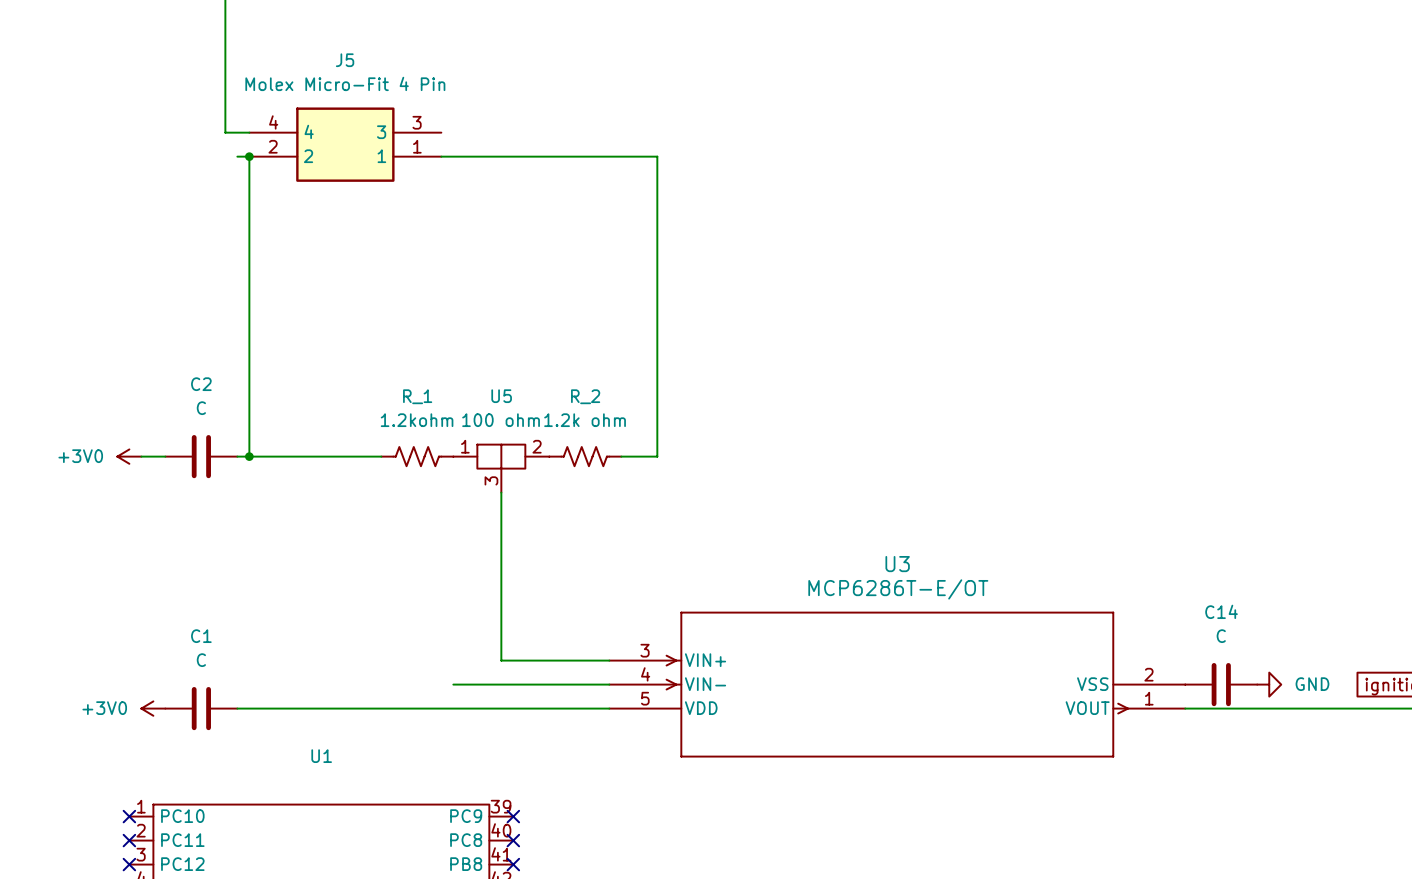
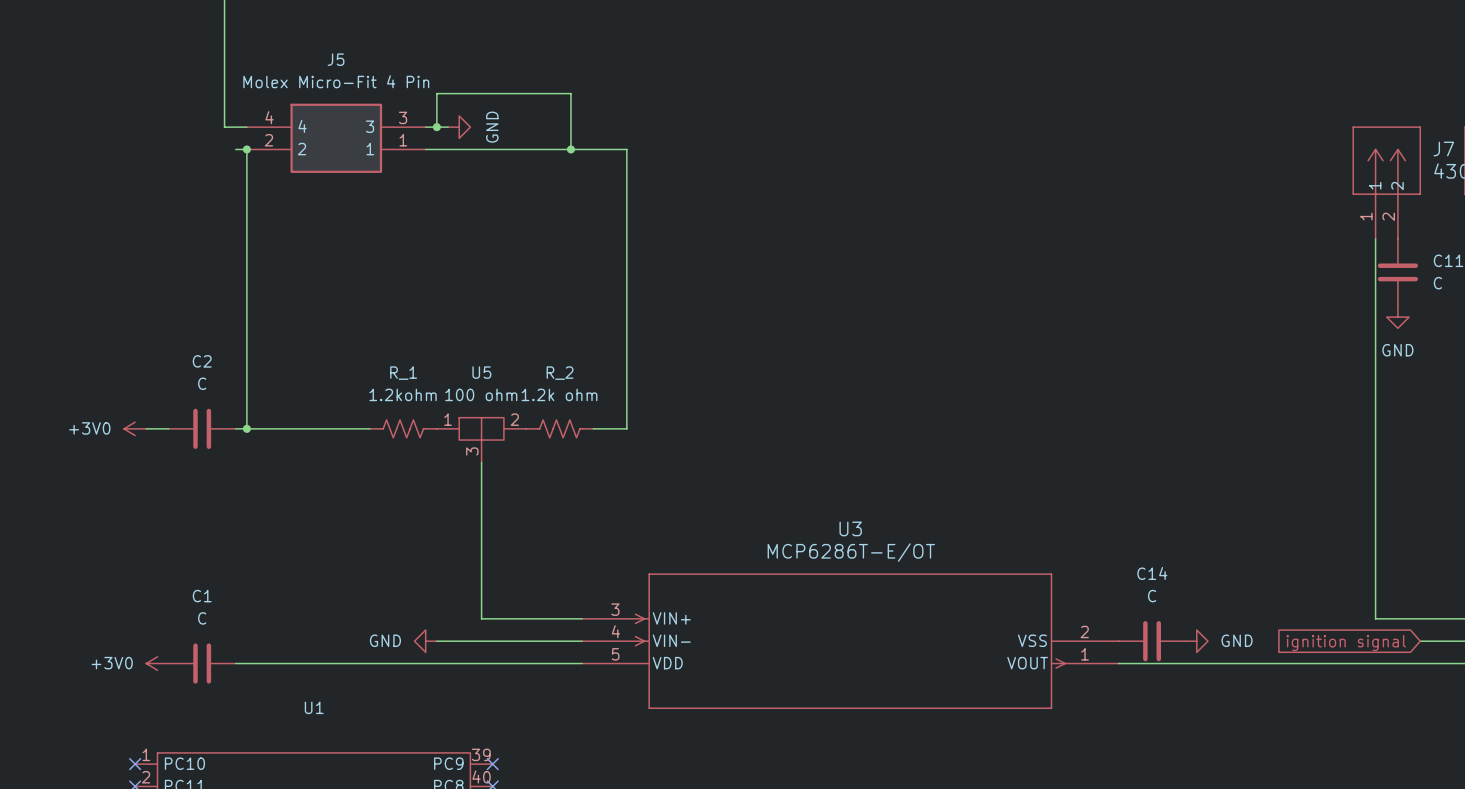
wire: none -> (425, 127) (448, 127)
wire: none -> (436, 127) (436, 93) (570, 93) (570, 149)
junction: none -> (436, 127)
power symbol: none -> GND (459, 127)
junction: none -> (570, 149)
power symbol: none -> GND (425, 641)

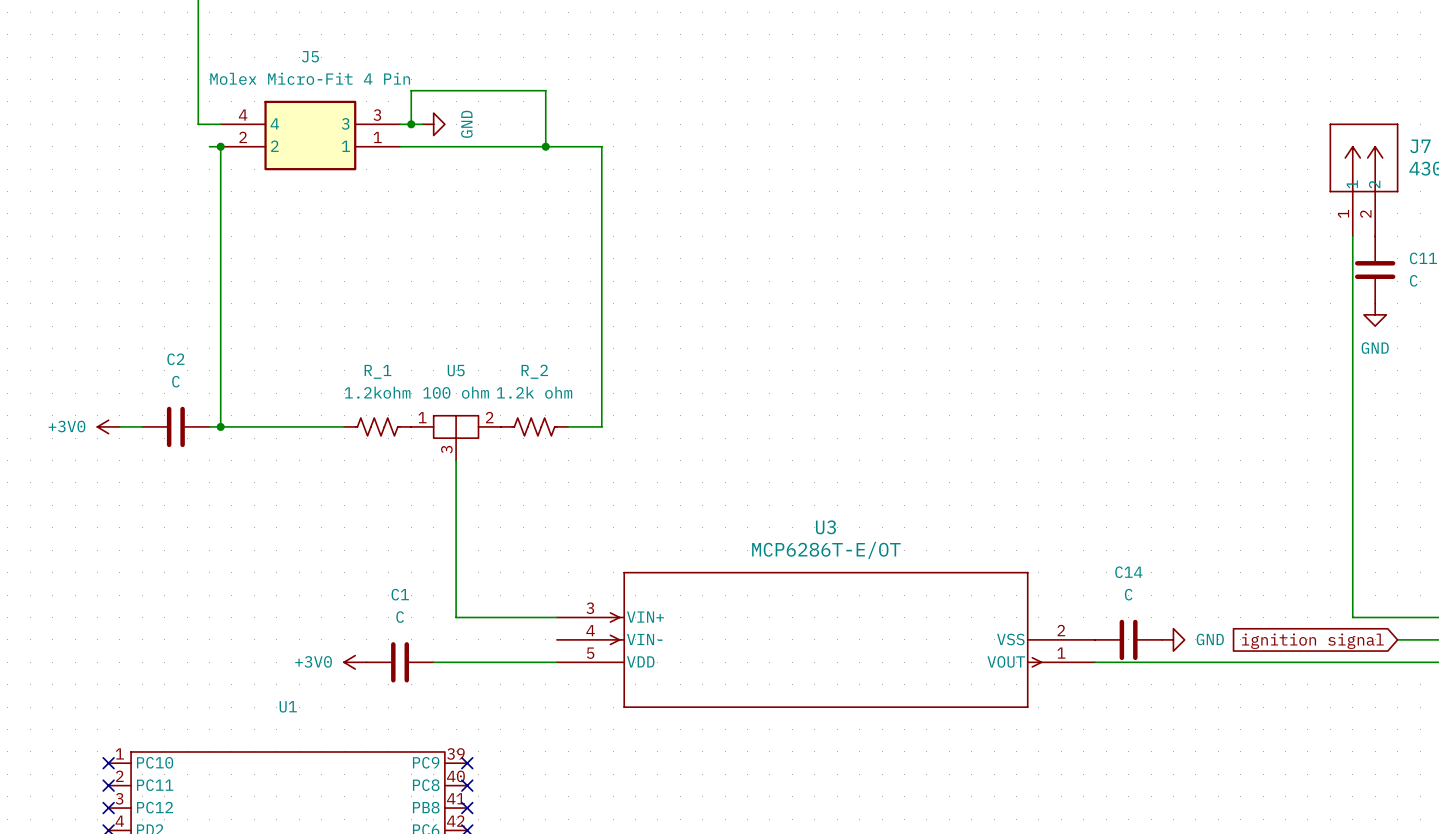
power symbol: GND (425, 641) -> none
wire: (436, 641) (582, 641) -> none
power symbol: +3V0 (157, 663) -> none
C1 position: (202, 663) -> (400, 662)
wire: (235, 663) (459, 663) -> none
power symbol: none -> +3V0 (355, 662)

